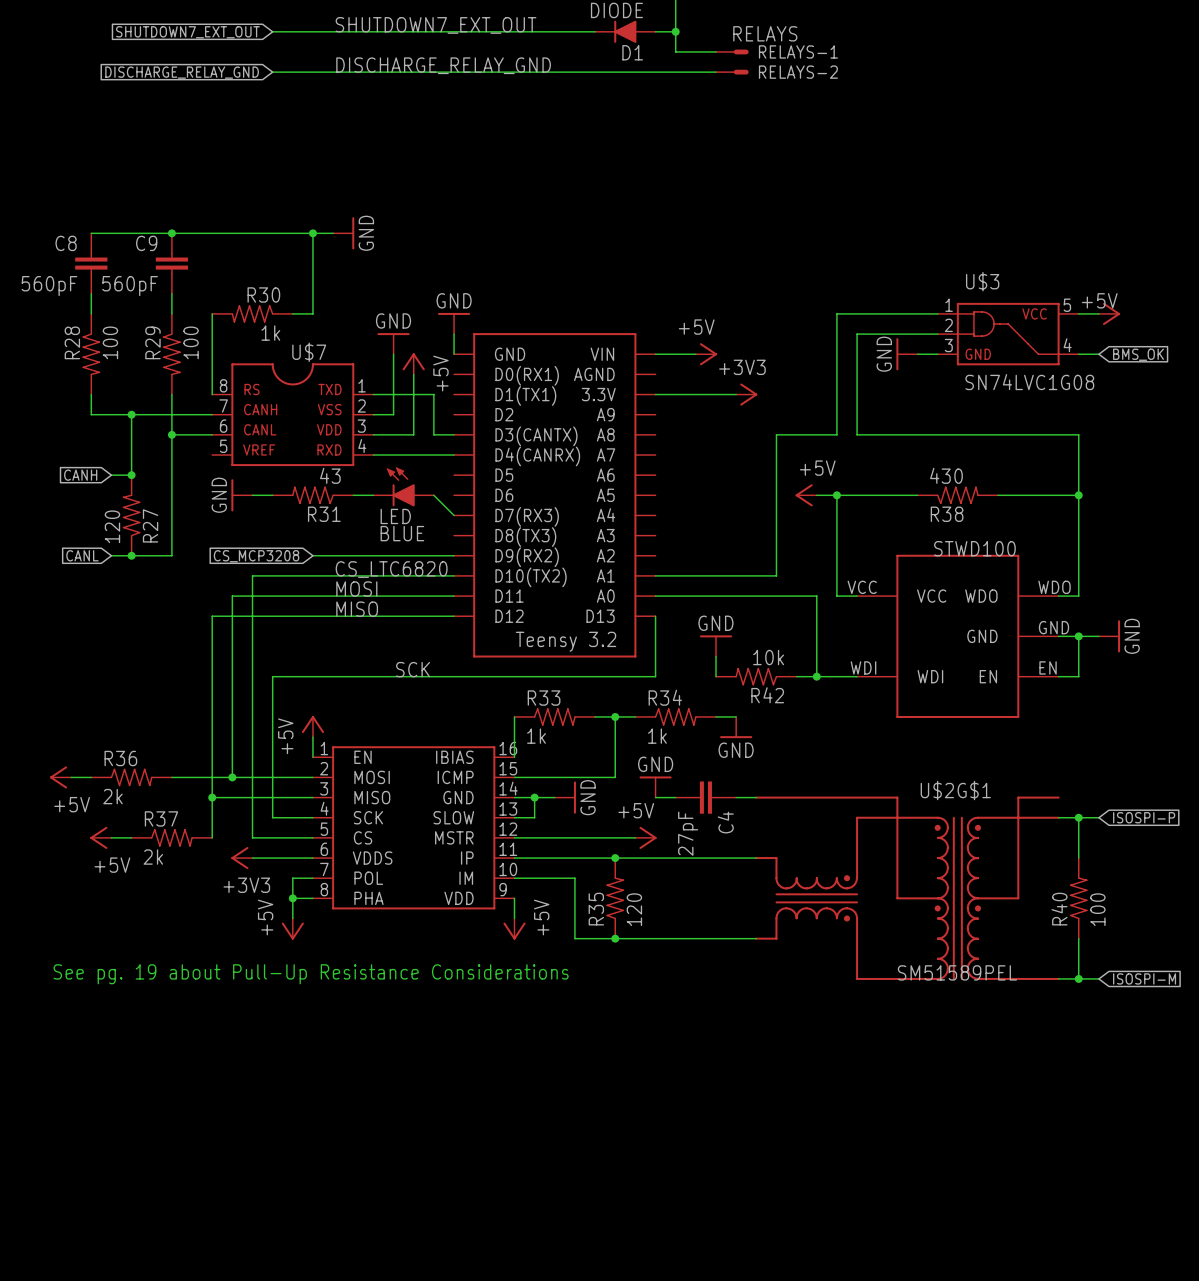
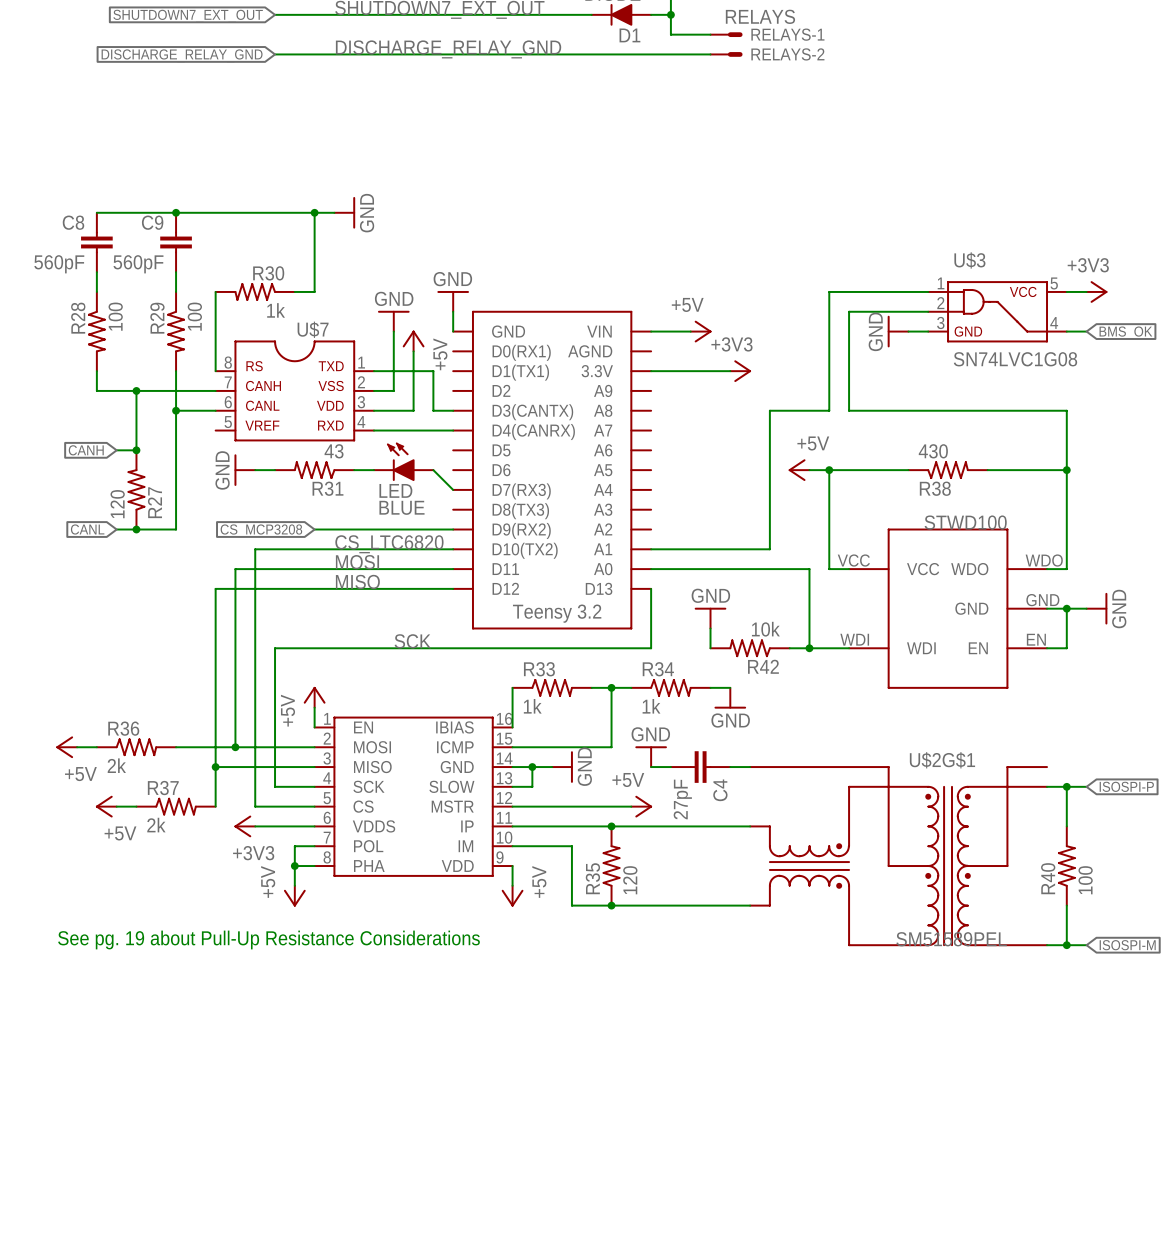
power symbol: +5V (1109, 313) -> +3V3 (1096, 291)

